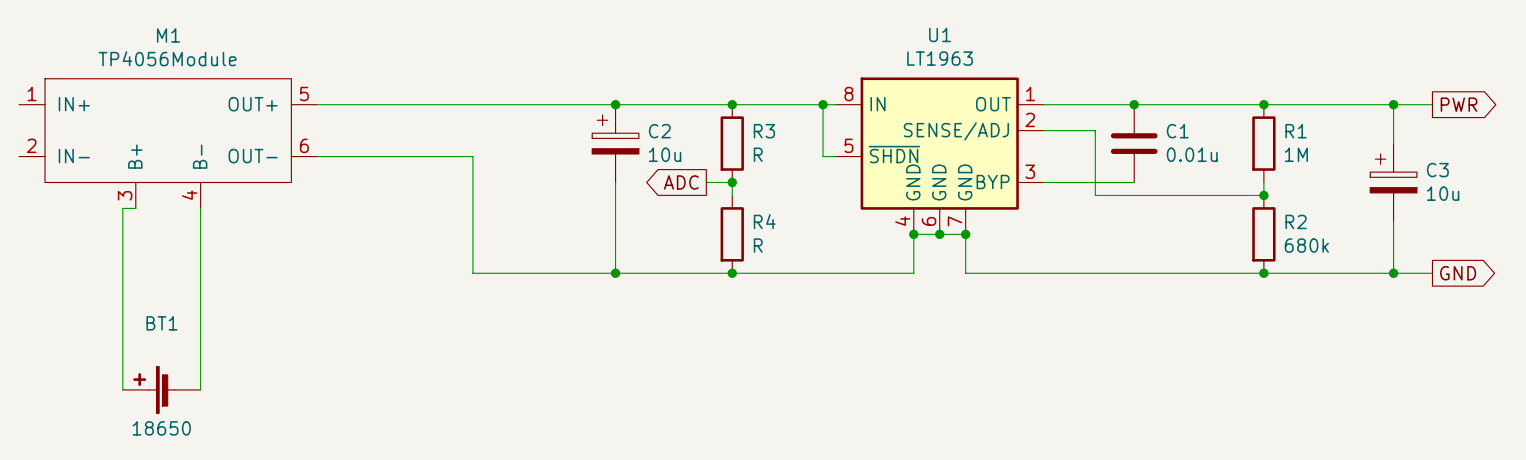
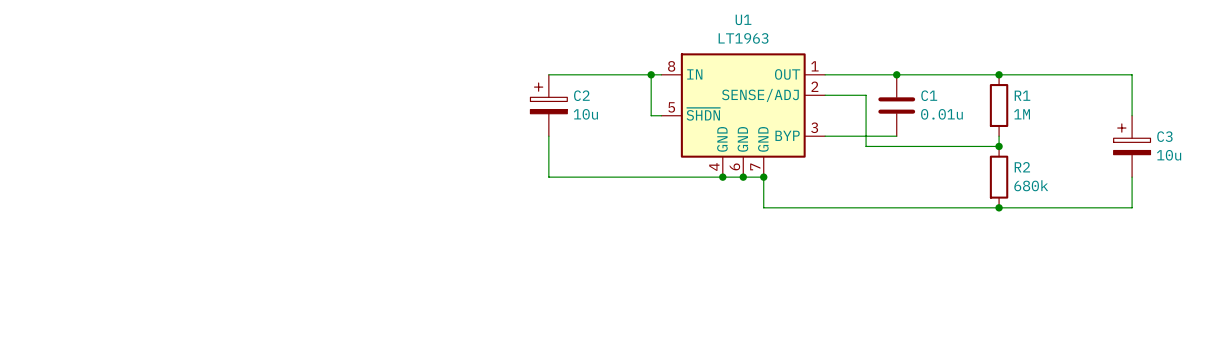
wire: (317, 104) (693, 104) -> none
junction: (615, 104) -> none
junction: (732, 104) -> none
wire: (1393, 104) (1393, 143) -> (1132, 177) (1132, 207)
junction: (1393, 104) -> none
global label: PWR (1459, 104) -> none
M1: TP4056Module (168, 143) -> none
C2 position: (615, 143) -> (548, 105)
R3: R (732, 143) -> none
wire: (317, 156) (472, 156) (472, 273) (913, 273) (913, 234) -> (548, 136) (548, 177) (722, 177)
wire: (615, 182) (615, 273) -> none
global label: ADC (681, 182) -> none
wire: (706, 182) (732, 182) (732, 195) -> none
junction: (732, 182) -> none
C3 position: (1393, 182) -> (1132, 146)
wire: (135, 208) (122, 208) (122, 389) -> none
wire: (200, 208) (200, 389) -> none
wire: (1393, 221) (1393, 273) -> (1132, 74) (1132, 115)
R4: R (732, 234) -> none
junction: (615, 273) -> none
junction: (732, 273) -> none
junction: (1393, 273) -> none
global label: GND (1458, 273) -> none
BT1: 18650 (161, 389) -> none

